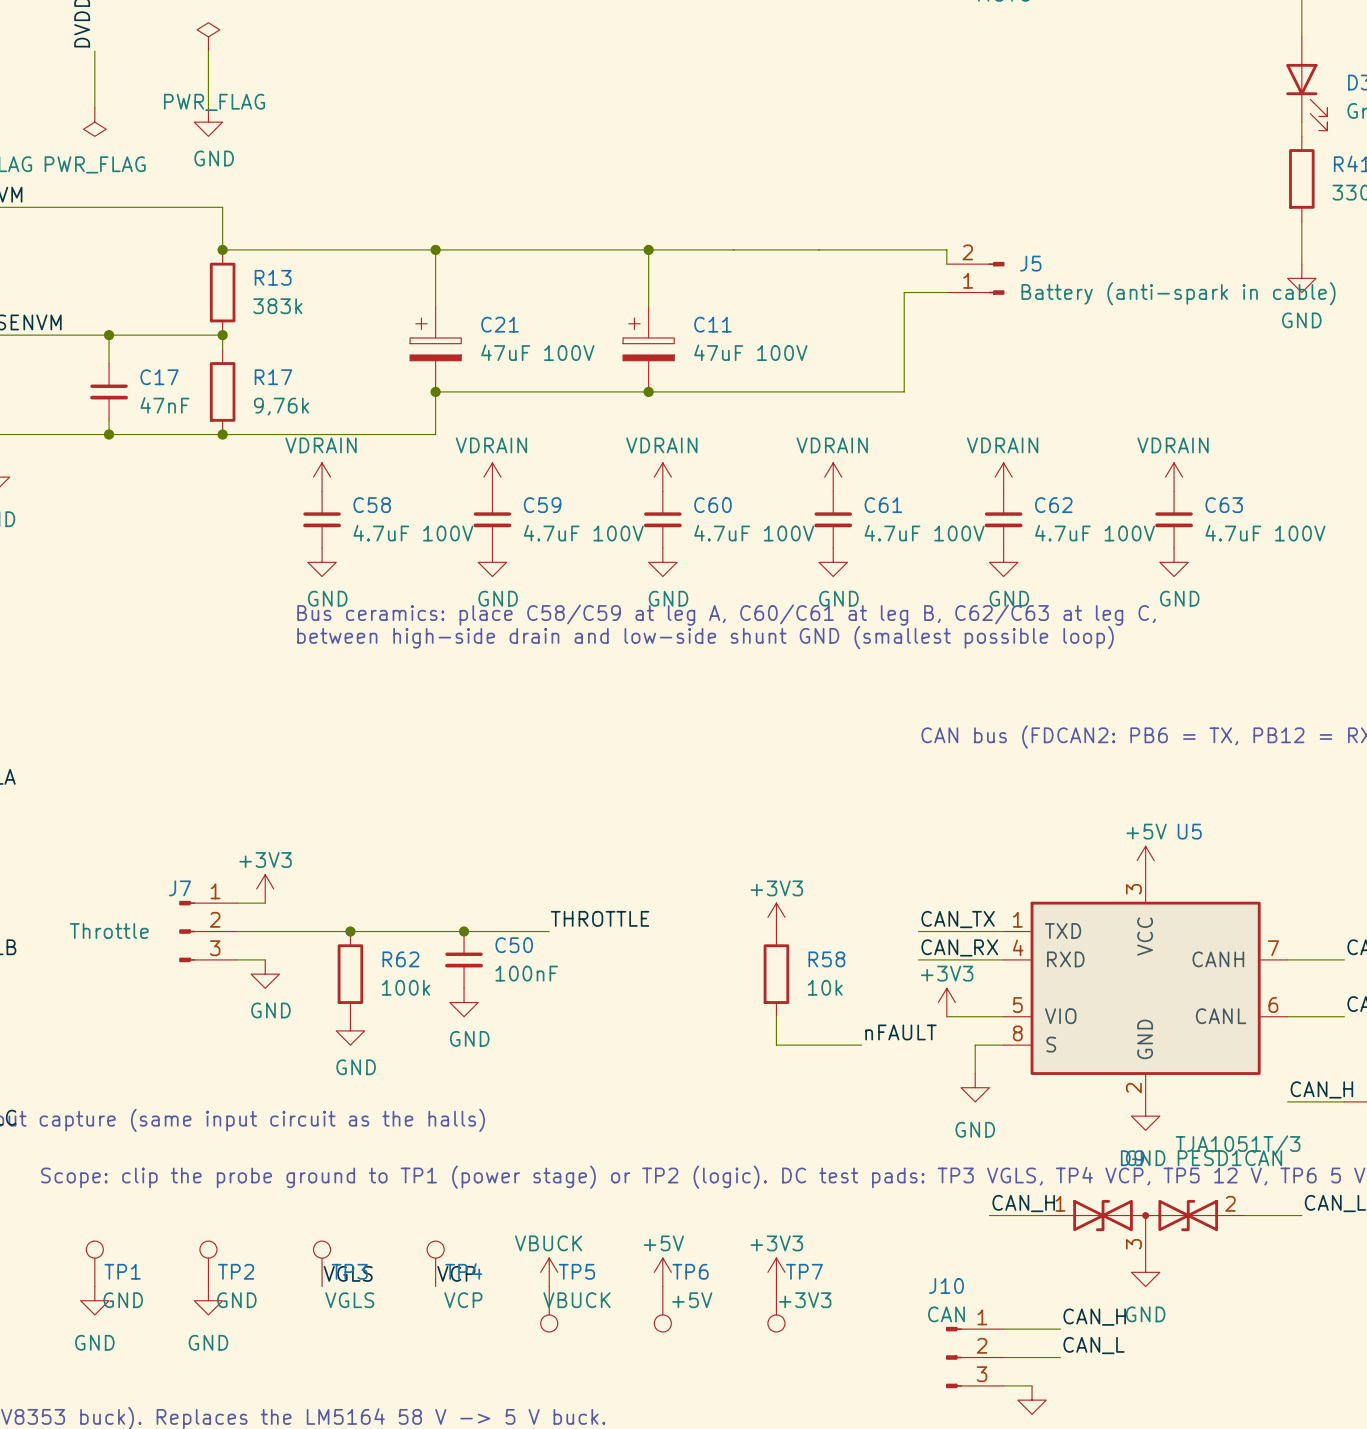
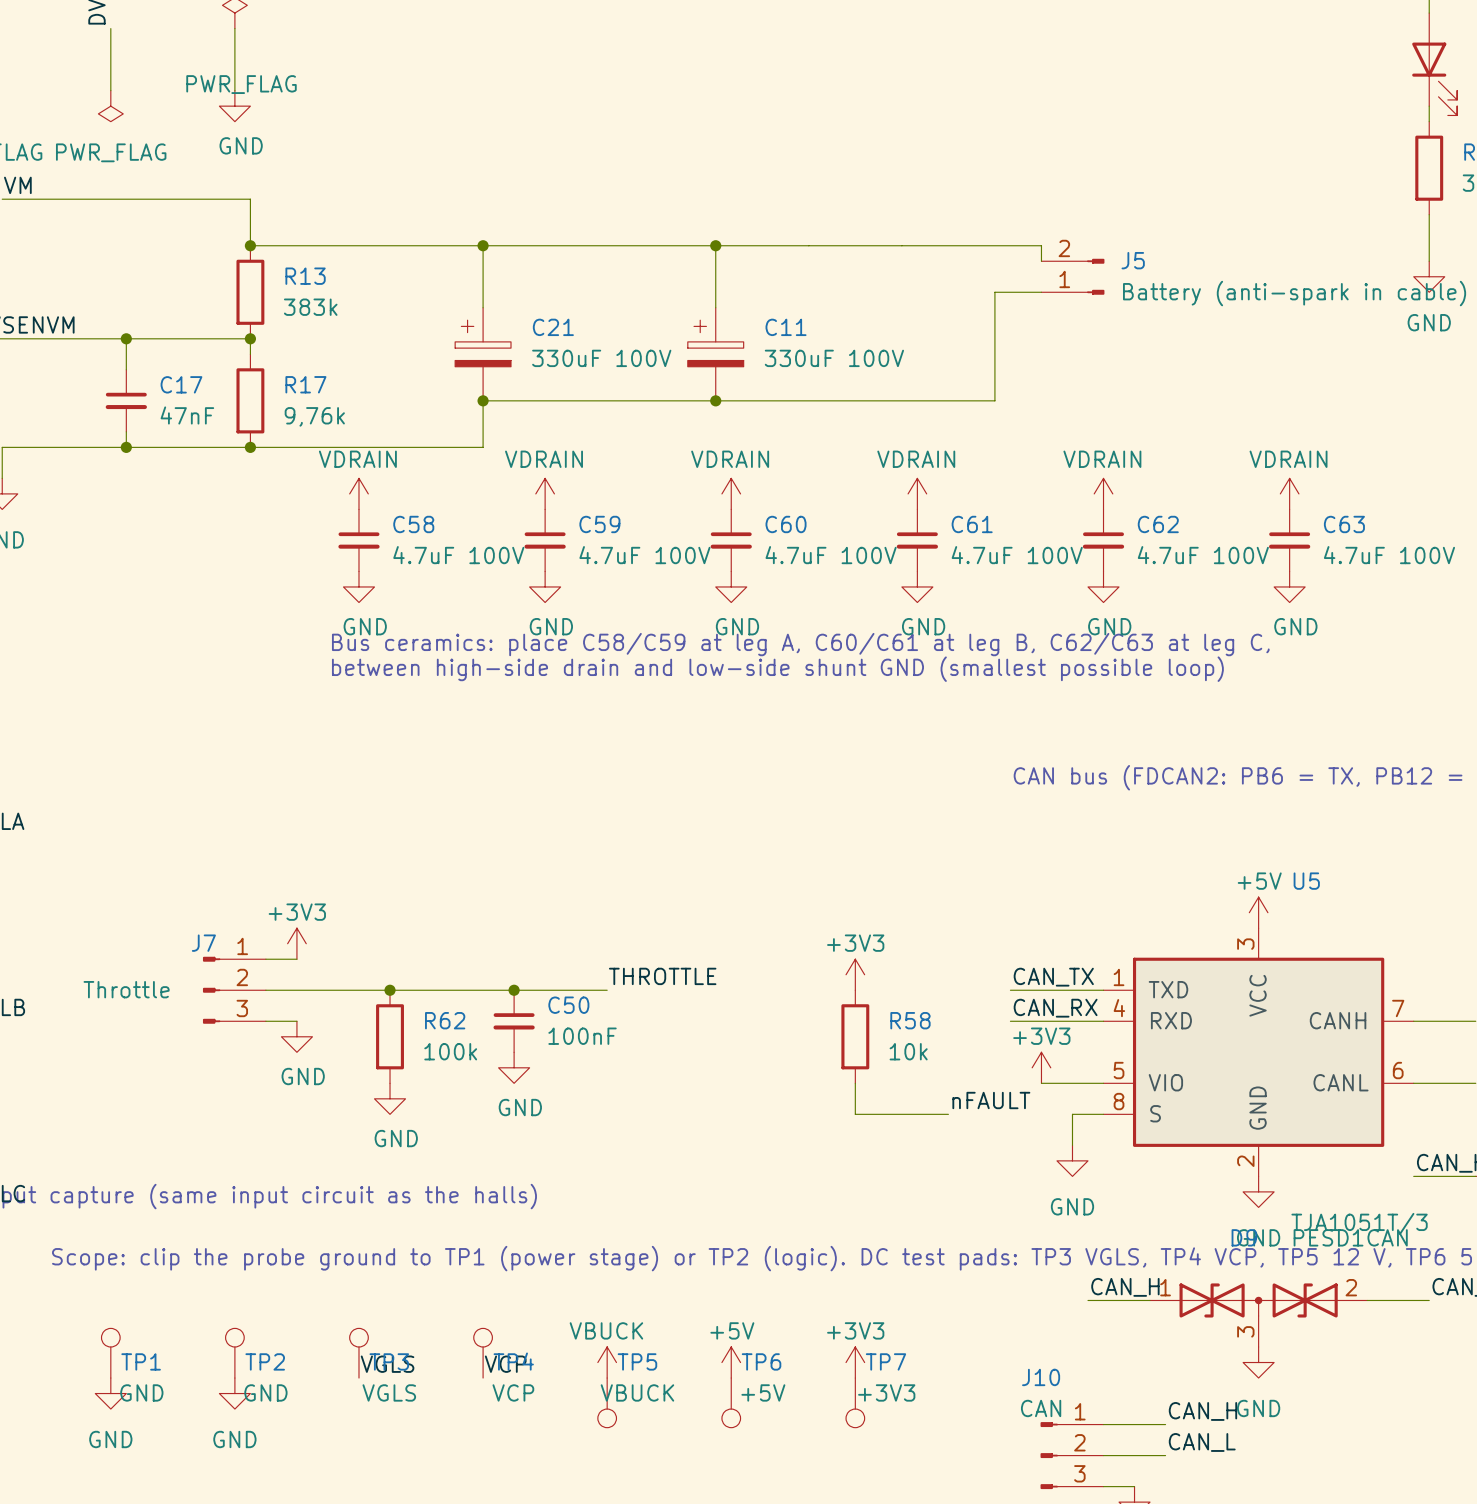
C21 value: 47uF 100V (537, 352) -> 330uF 100V (601, 358)
C11 value: 47uF 100V (750, 352) -> 330uF 100V (834, 358)

